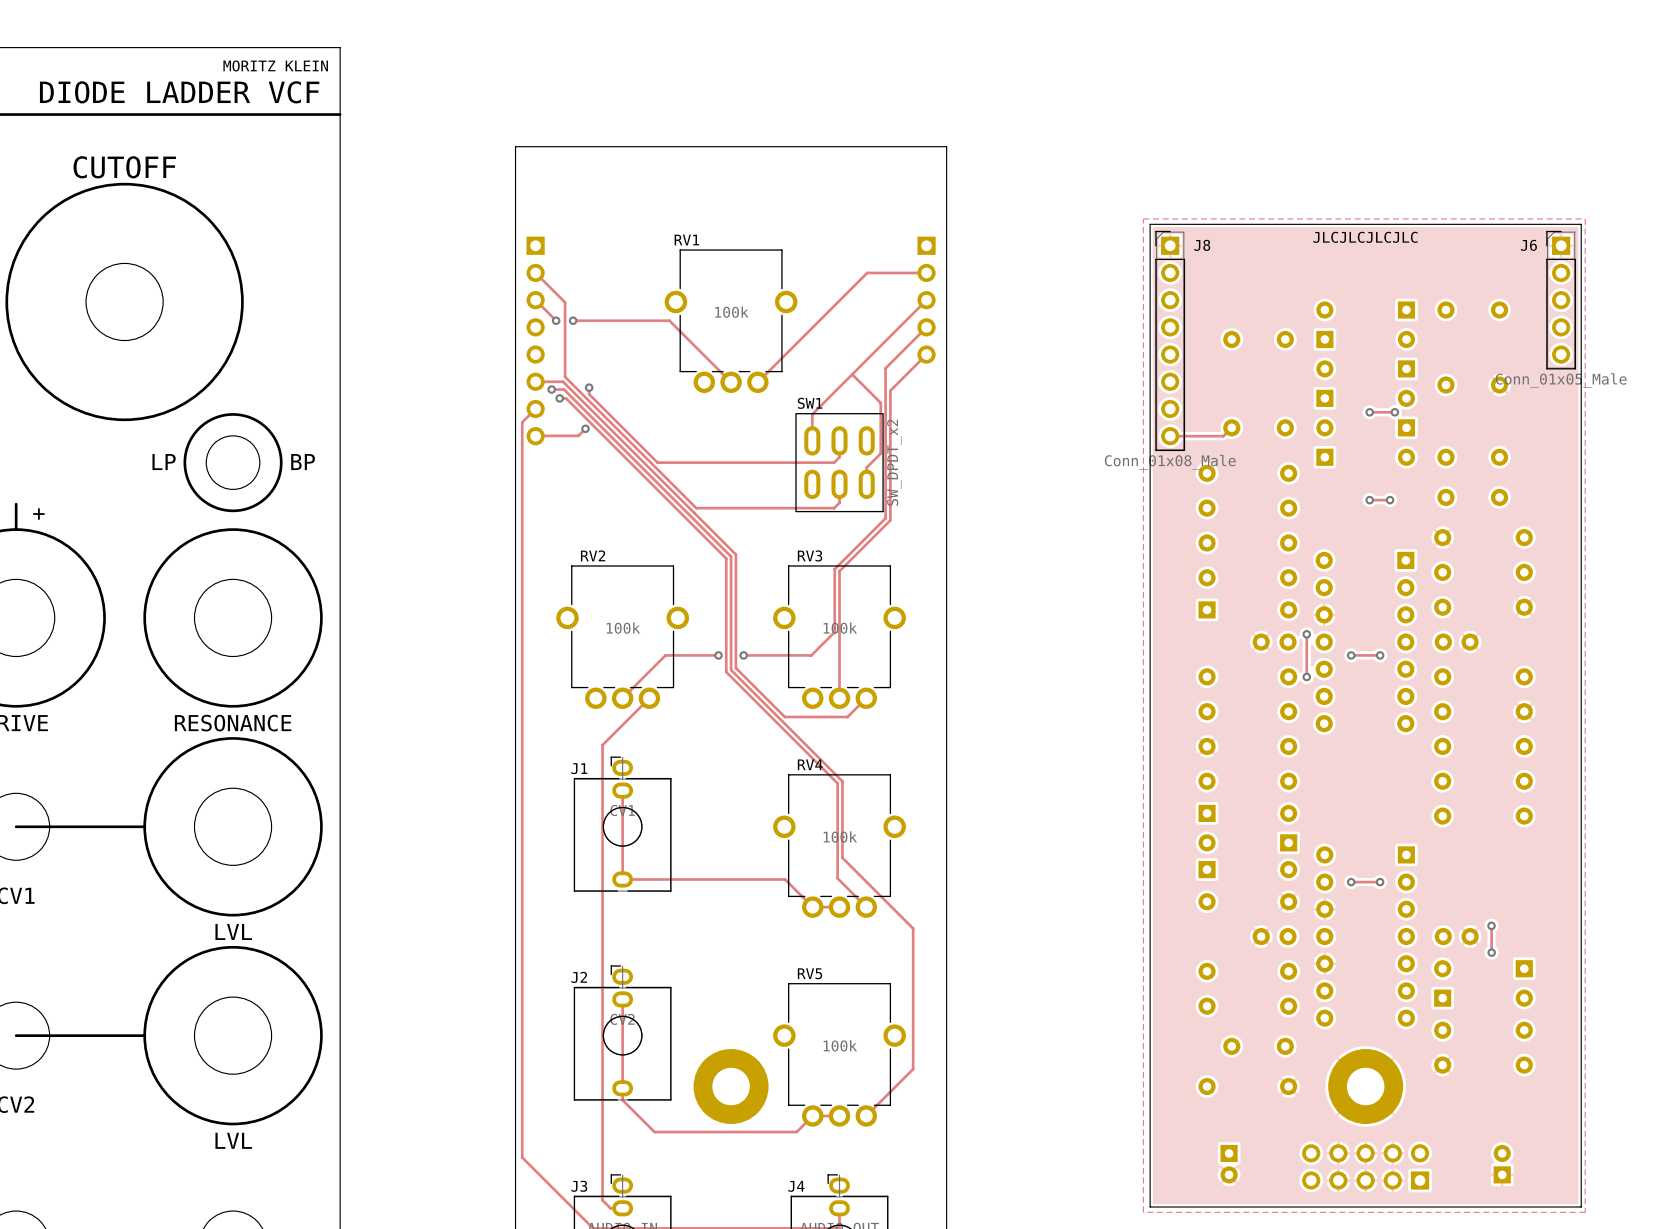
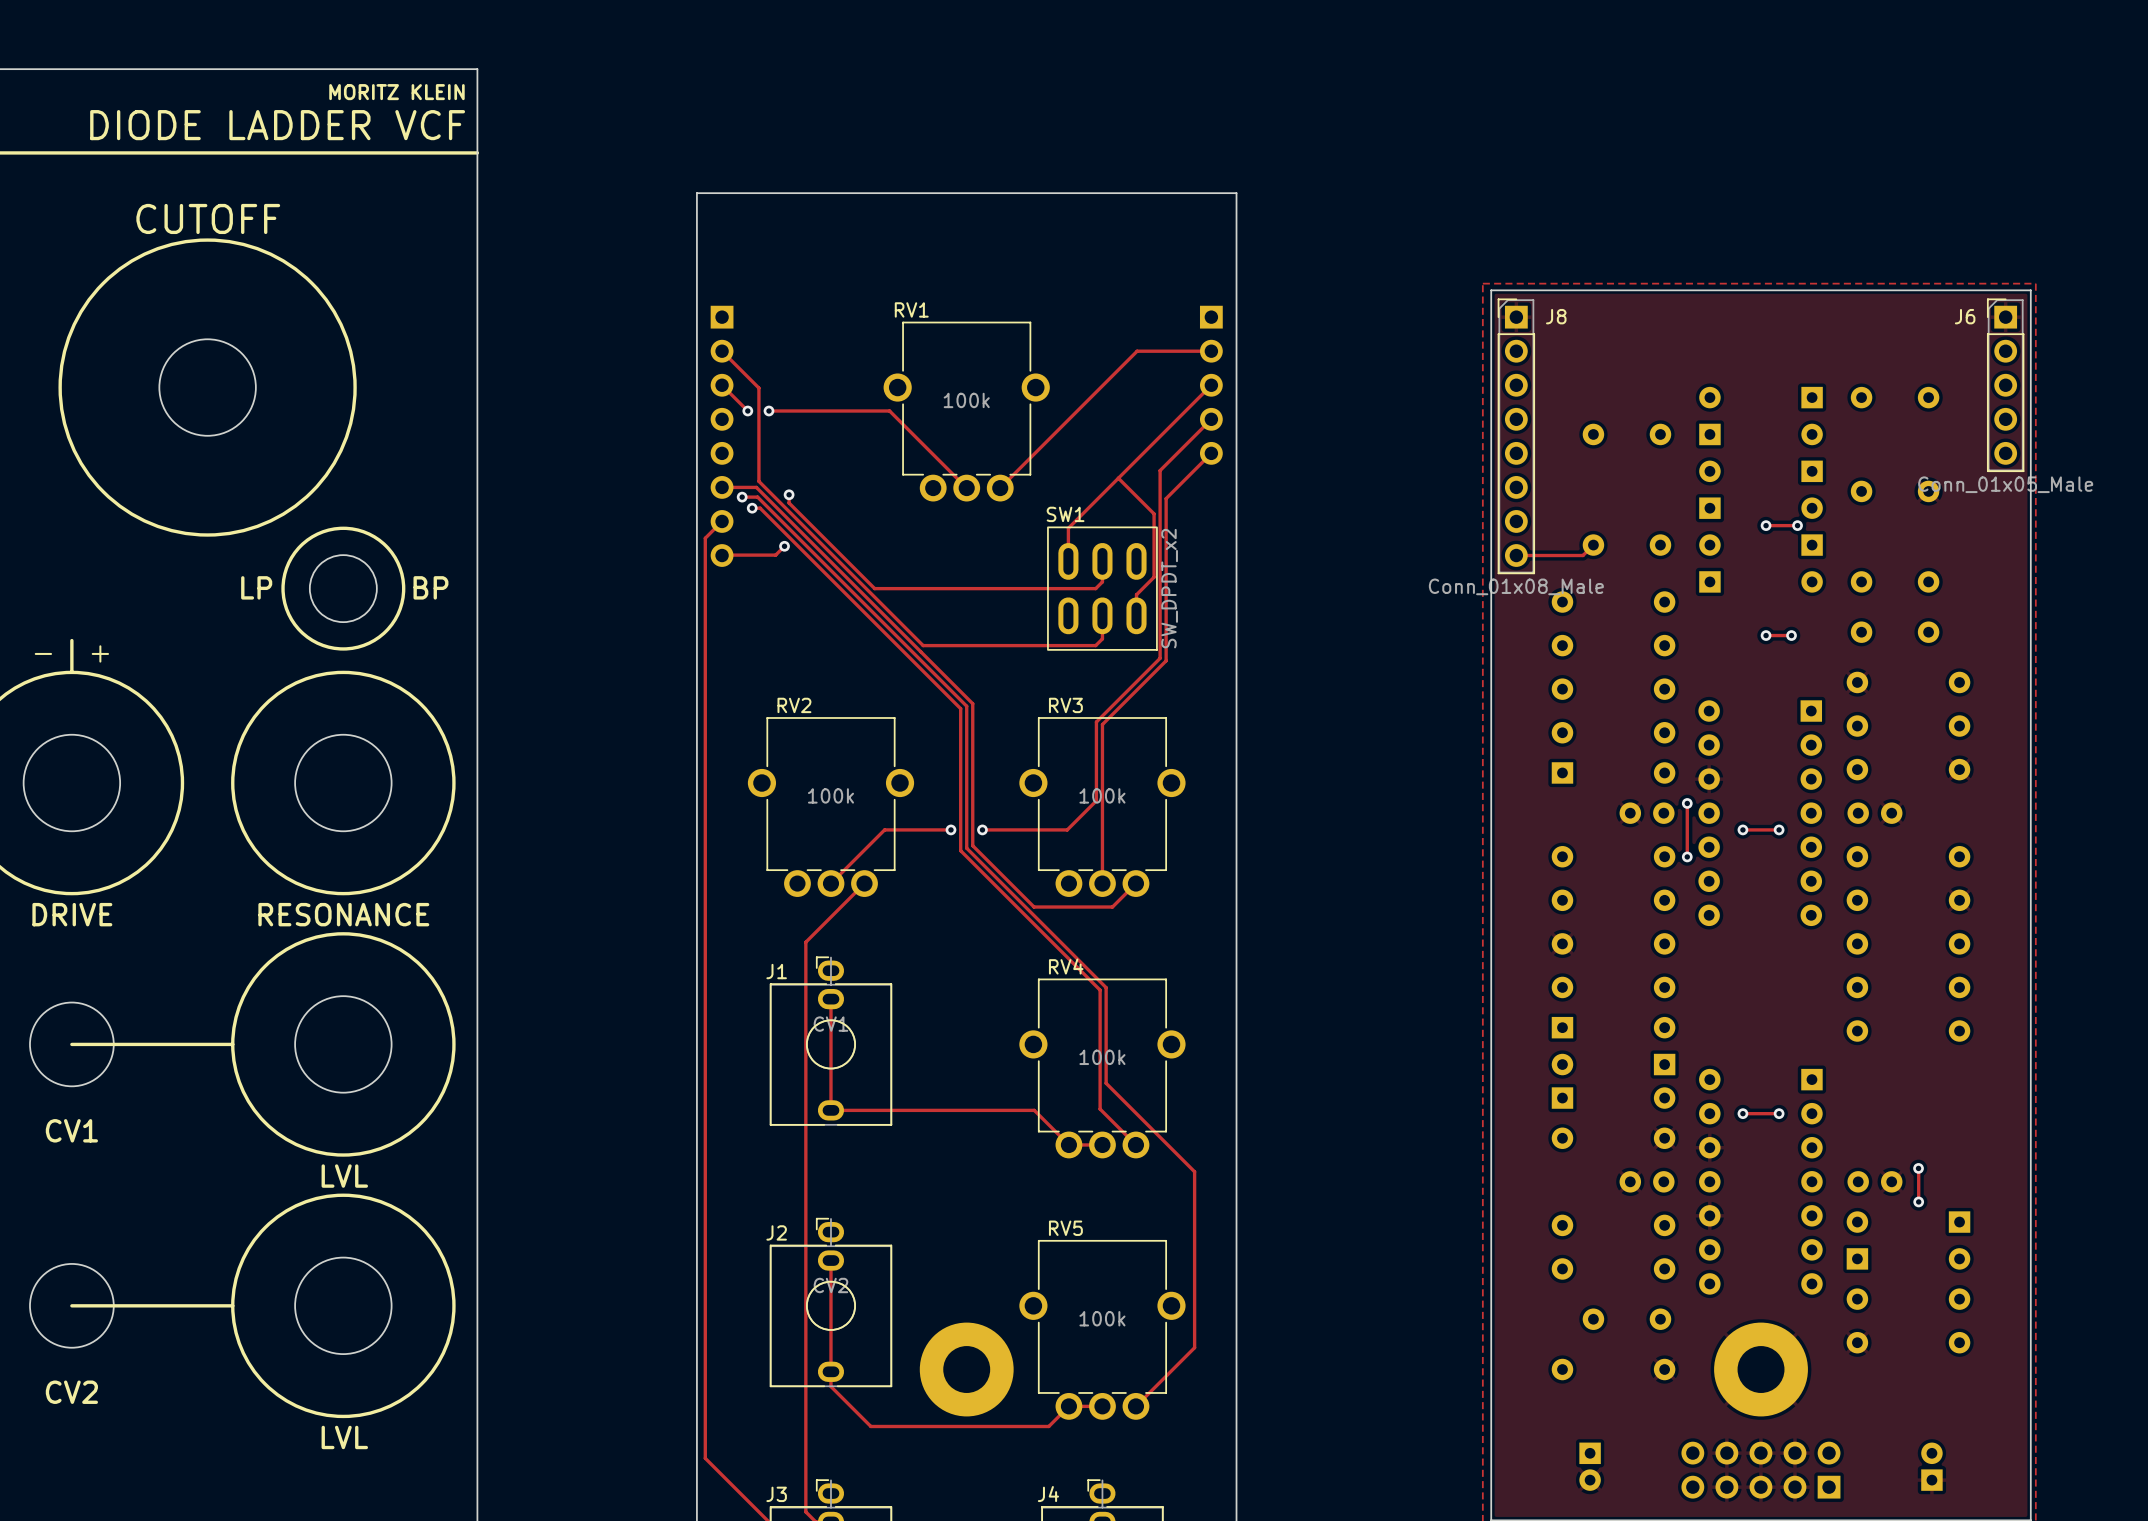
text: JLCJLCJLCJLC (1365, 237) -> none

